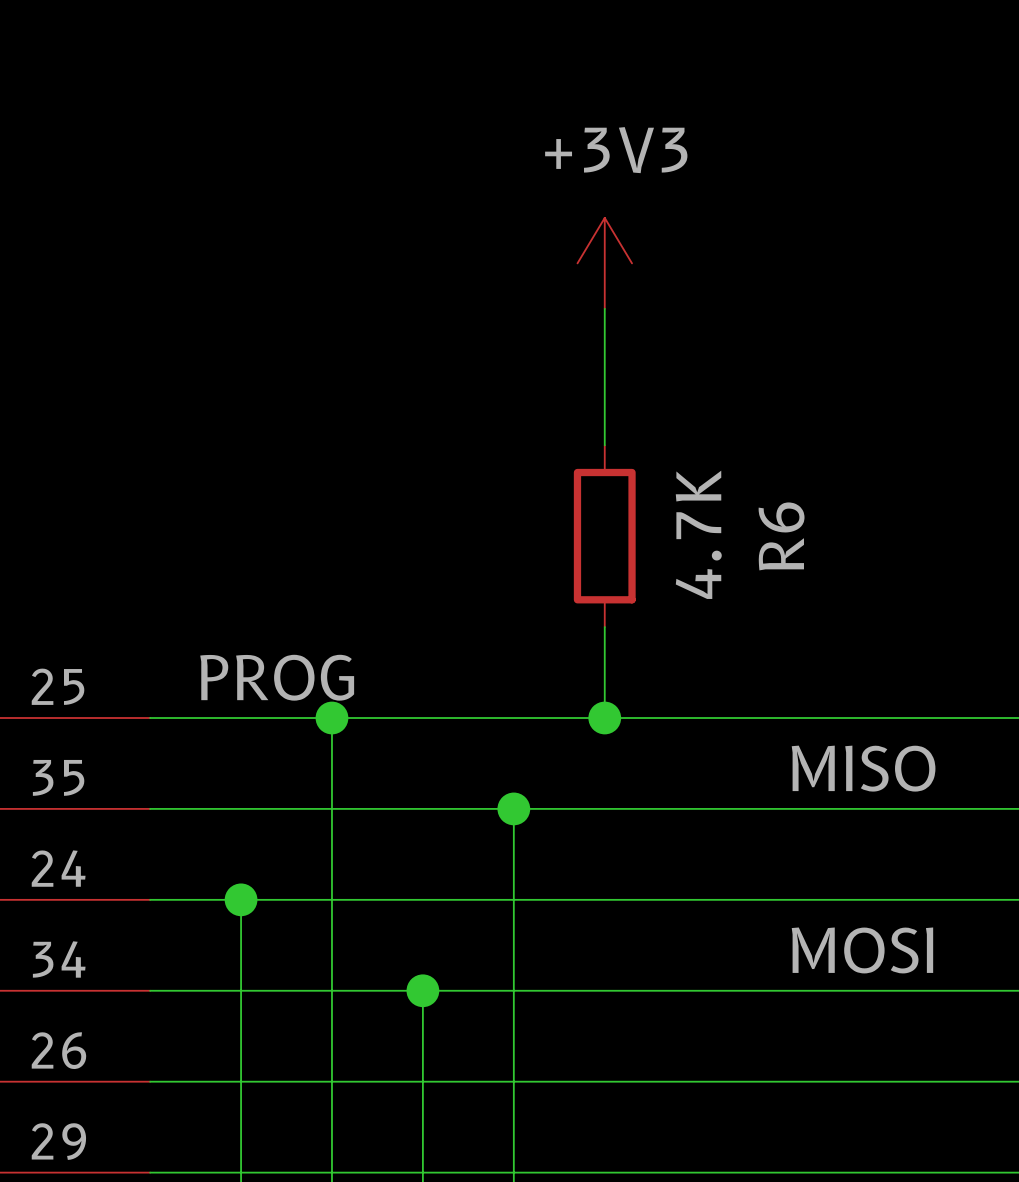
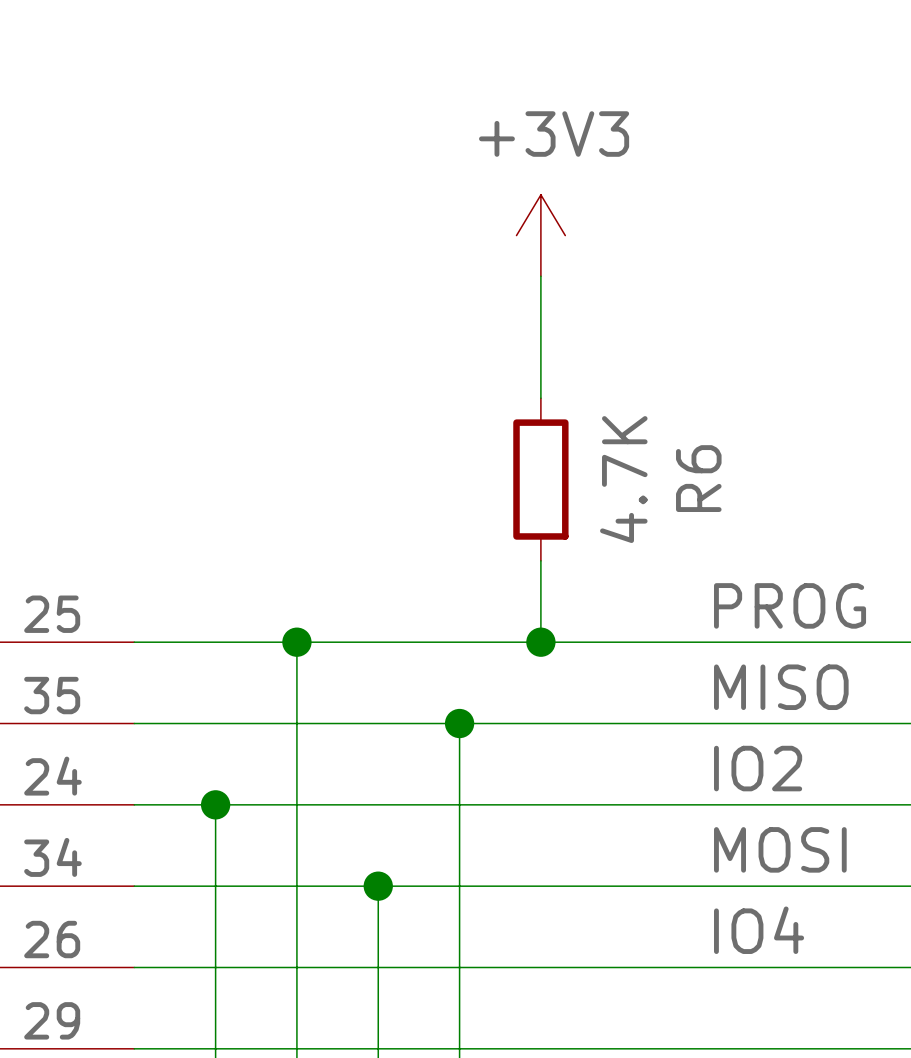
label position: PROG (277, 677) -> PROG (790, 605)
label: none -> IO2 (758, 768)
label: none -> IO4 (759, 930)

